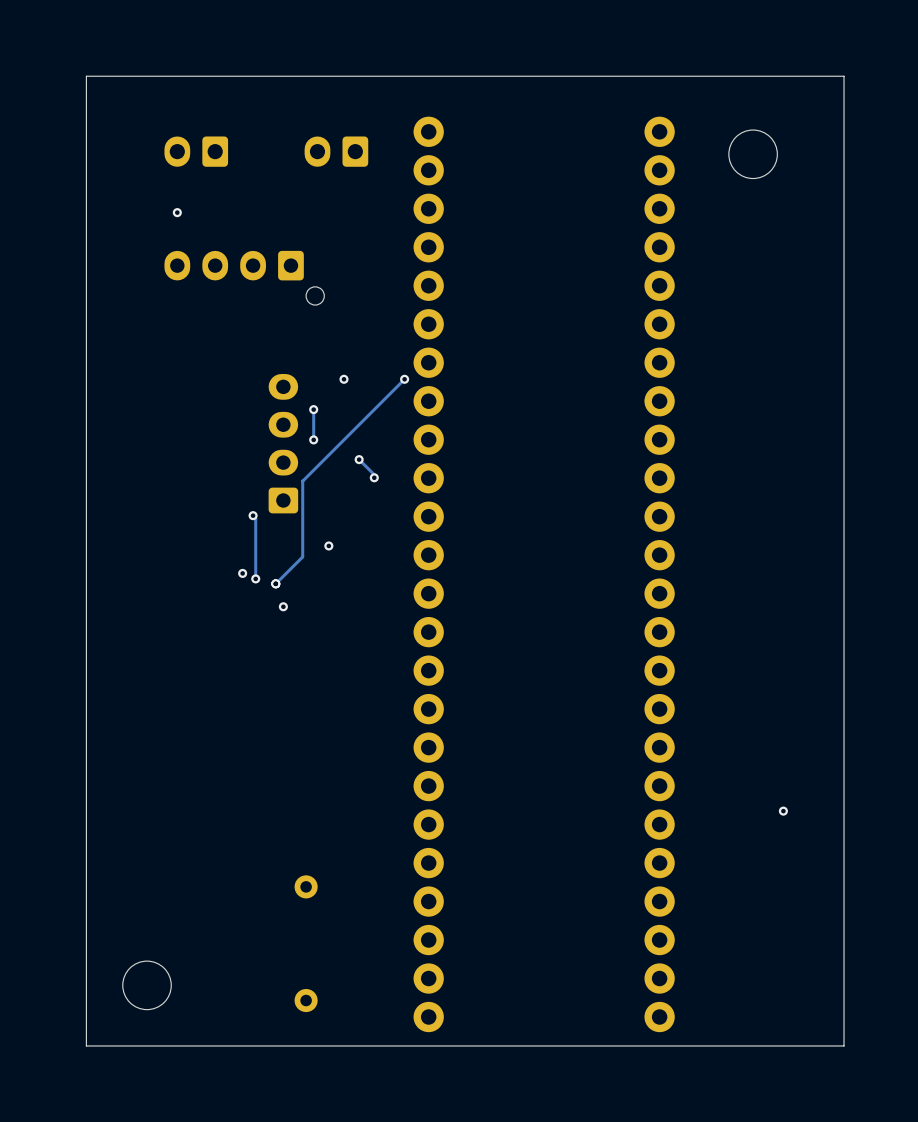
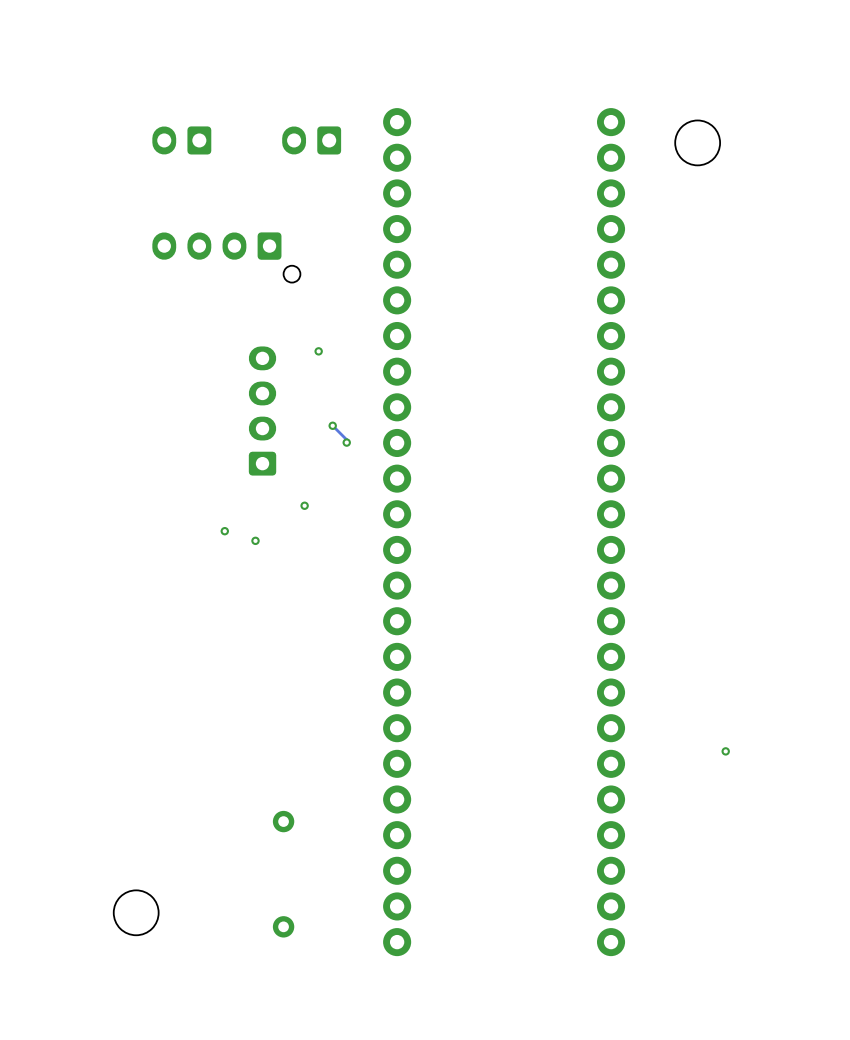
board edge: (844, 76) (86, 76) (86, 1045) (844, 1045) (844, 76) -> none
via: (177, 212) -> none
track: (404, 379) (302, 481) (302, 556) (275, 583) -> none
via: (404, 379) -> none
track: (313, 409) (313, 439) -> none
via: (313, 409) -> none
via: (313, 439) -> none
track: (253, 515) (255, 518) (255, 578) -> none
via: (253, 515) -> none
via: (255, 578) -> none
via: (283, 606) -> none

